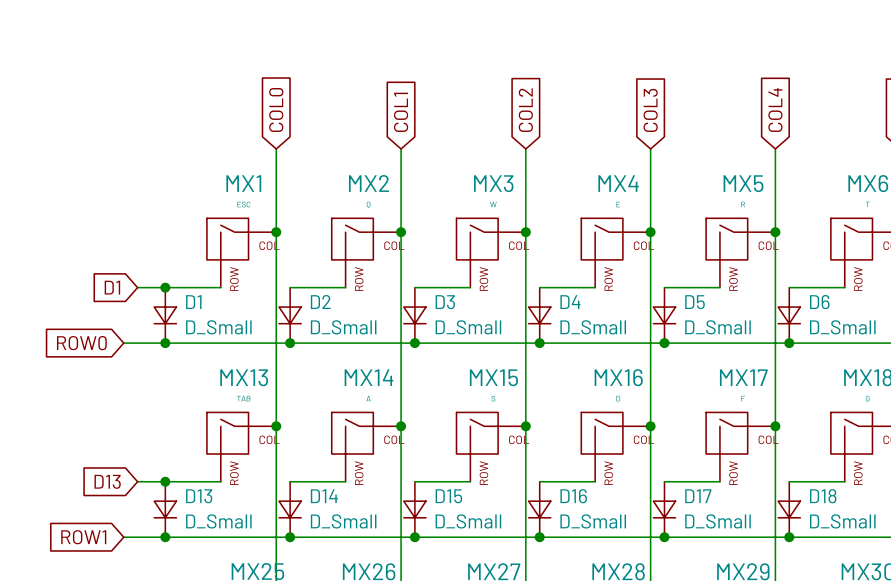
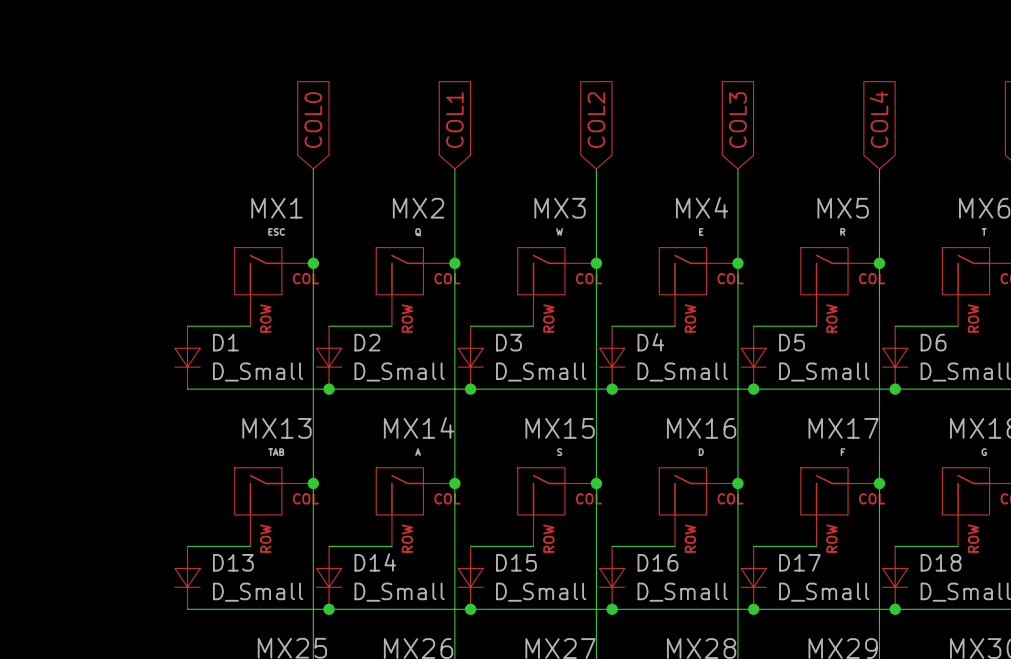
global label: D1 (112, 287) -> none
wire: (137, 287) (165, 287) -> none
junction: (165, 287) -> none
global label: ROW0 (81, 343) -> none
wire: (123, 343) (165, 343) -> none
junction: (165, 343) -> none
global label: D13 (107, 481) -> none
wire: (137, 481) (165, 481) -> none
junction: (165, 481) -> none
global label: ROW1 (83, 537) -> none
wire: (123, 537) (165, 537) -> none
junction: (165, 537) -> none

